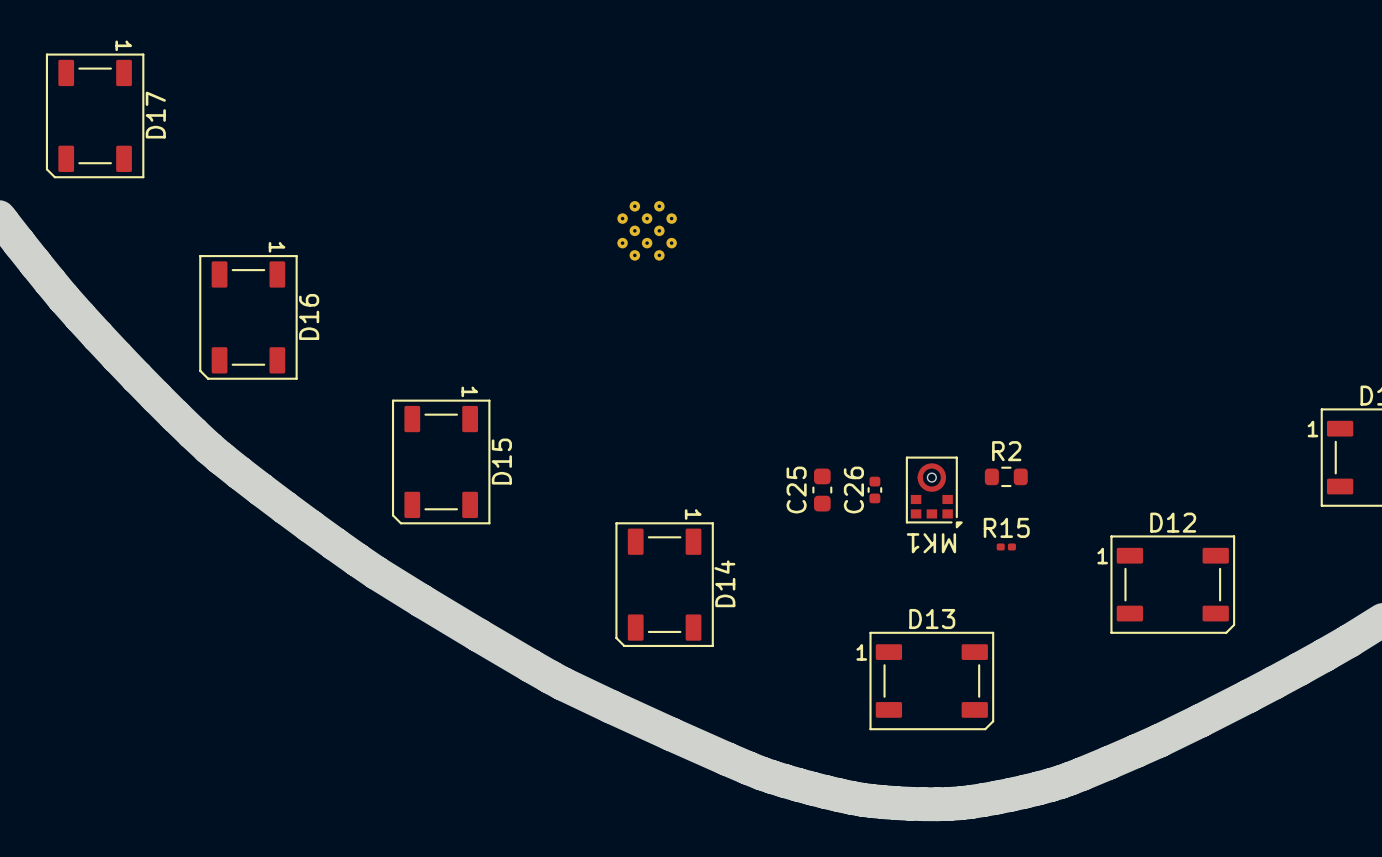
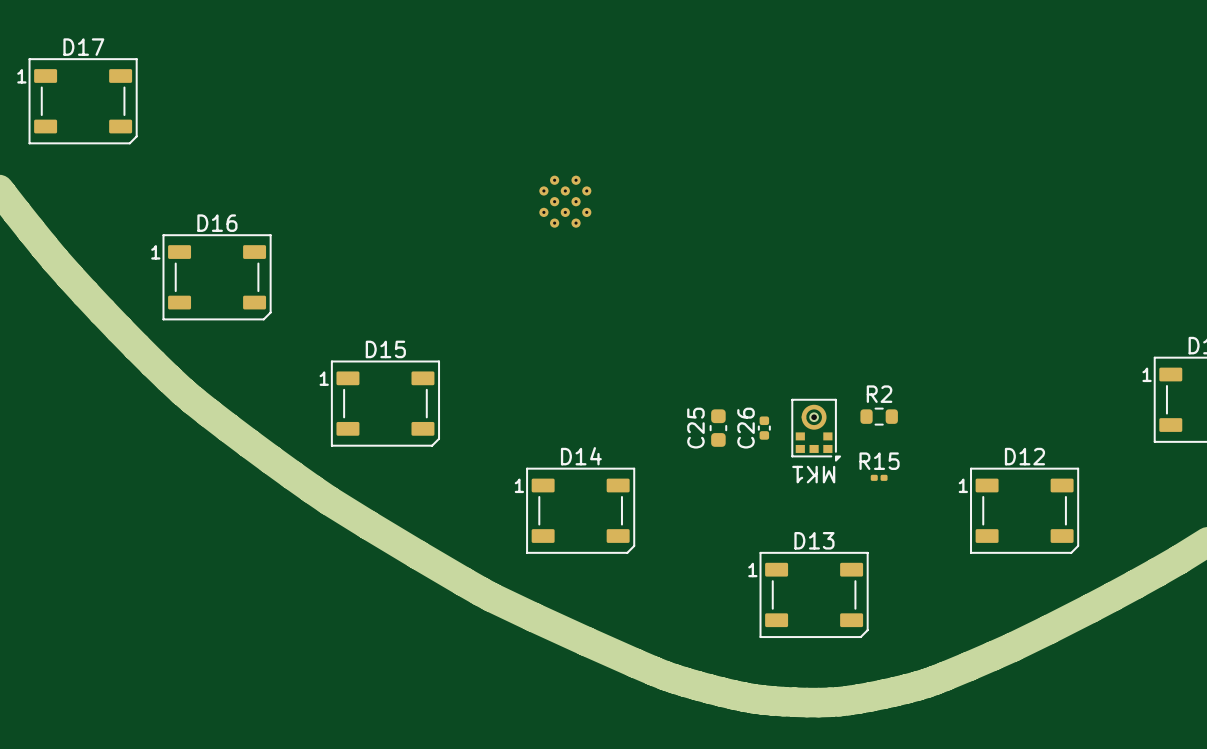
D17 rotation: 0° (95, 115) -> 90° counterclockwise (83, 101)
D16 rotation: 0° (248, 317) -> 90° counterclockwise (217, 277)
D15 rotation: 0° (441, 461) -> 90° counterclockwise (385, 403)
D14 rotation: 0° (664, 584) -> 90° counterclockwise (580, 510)

